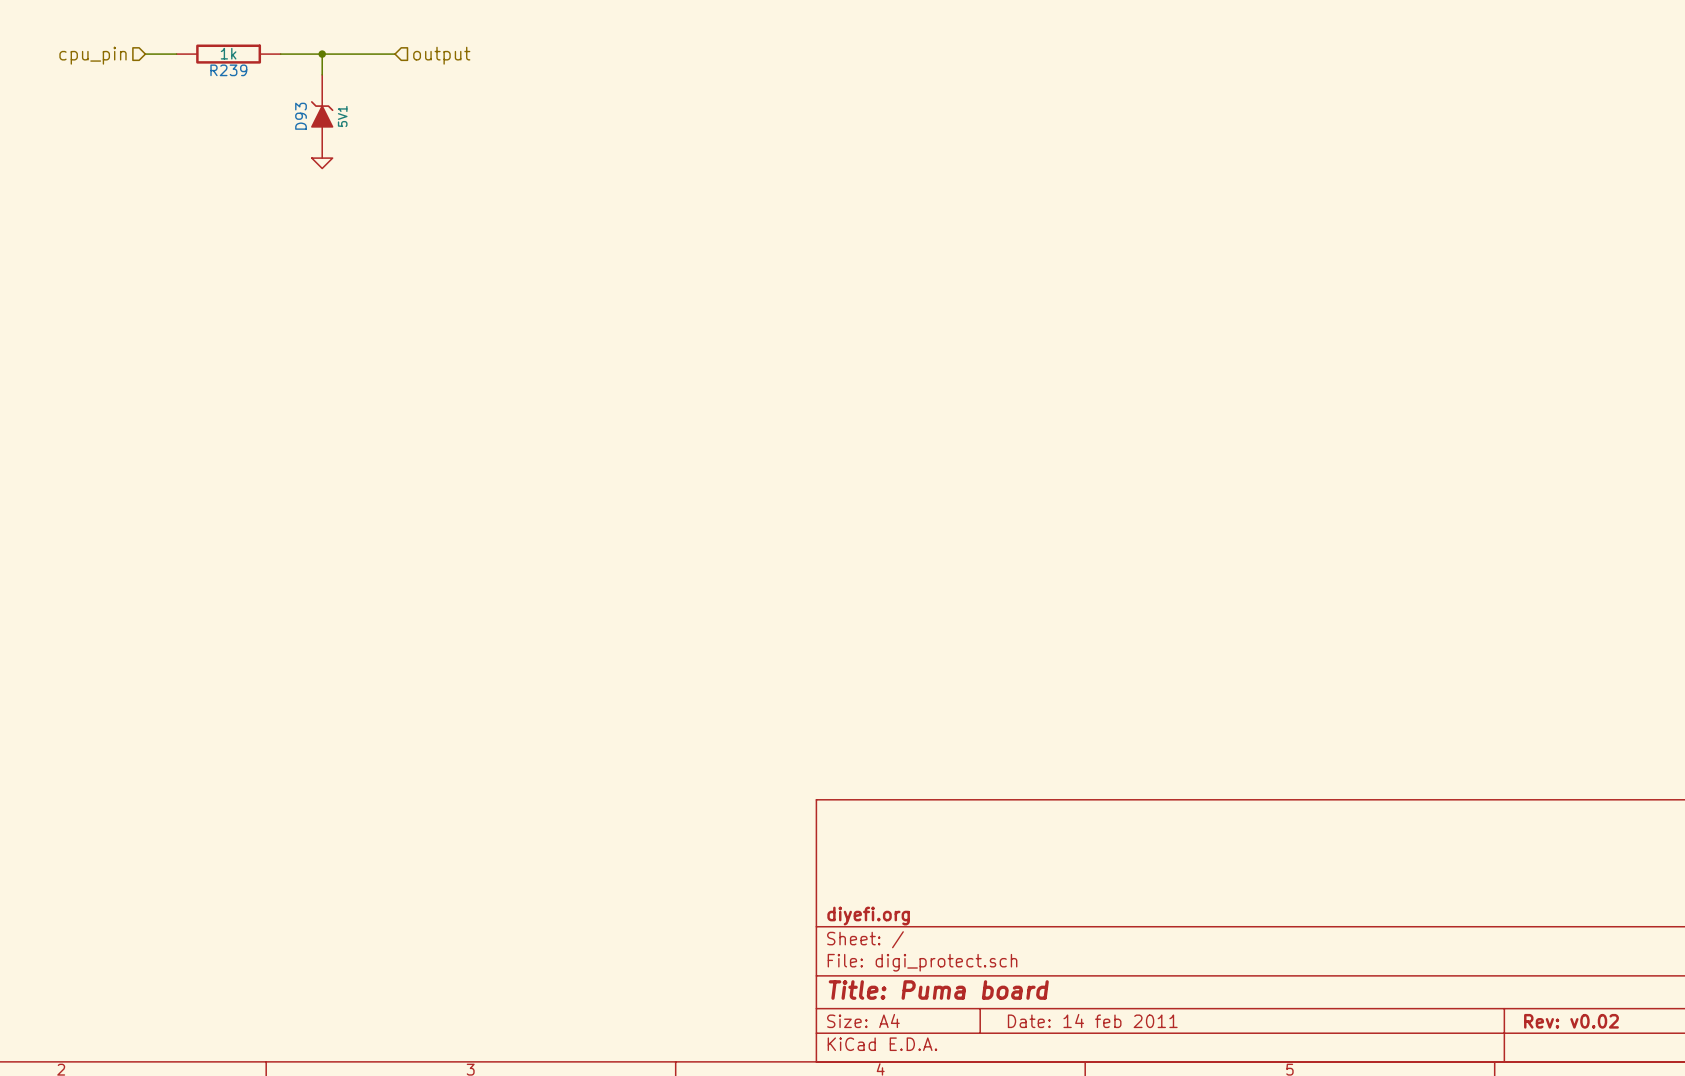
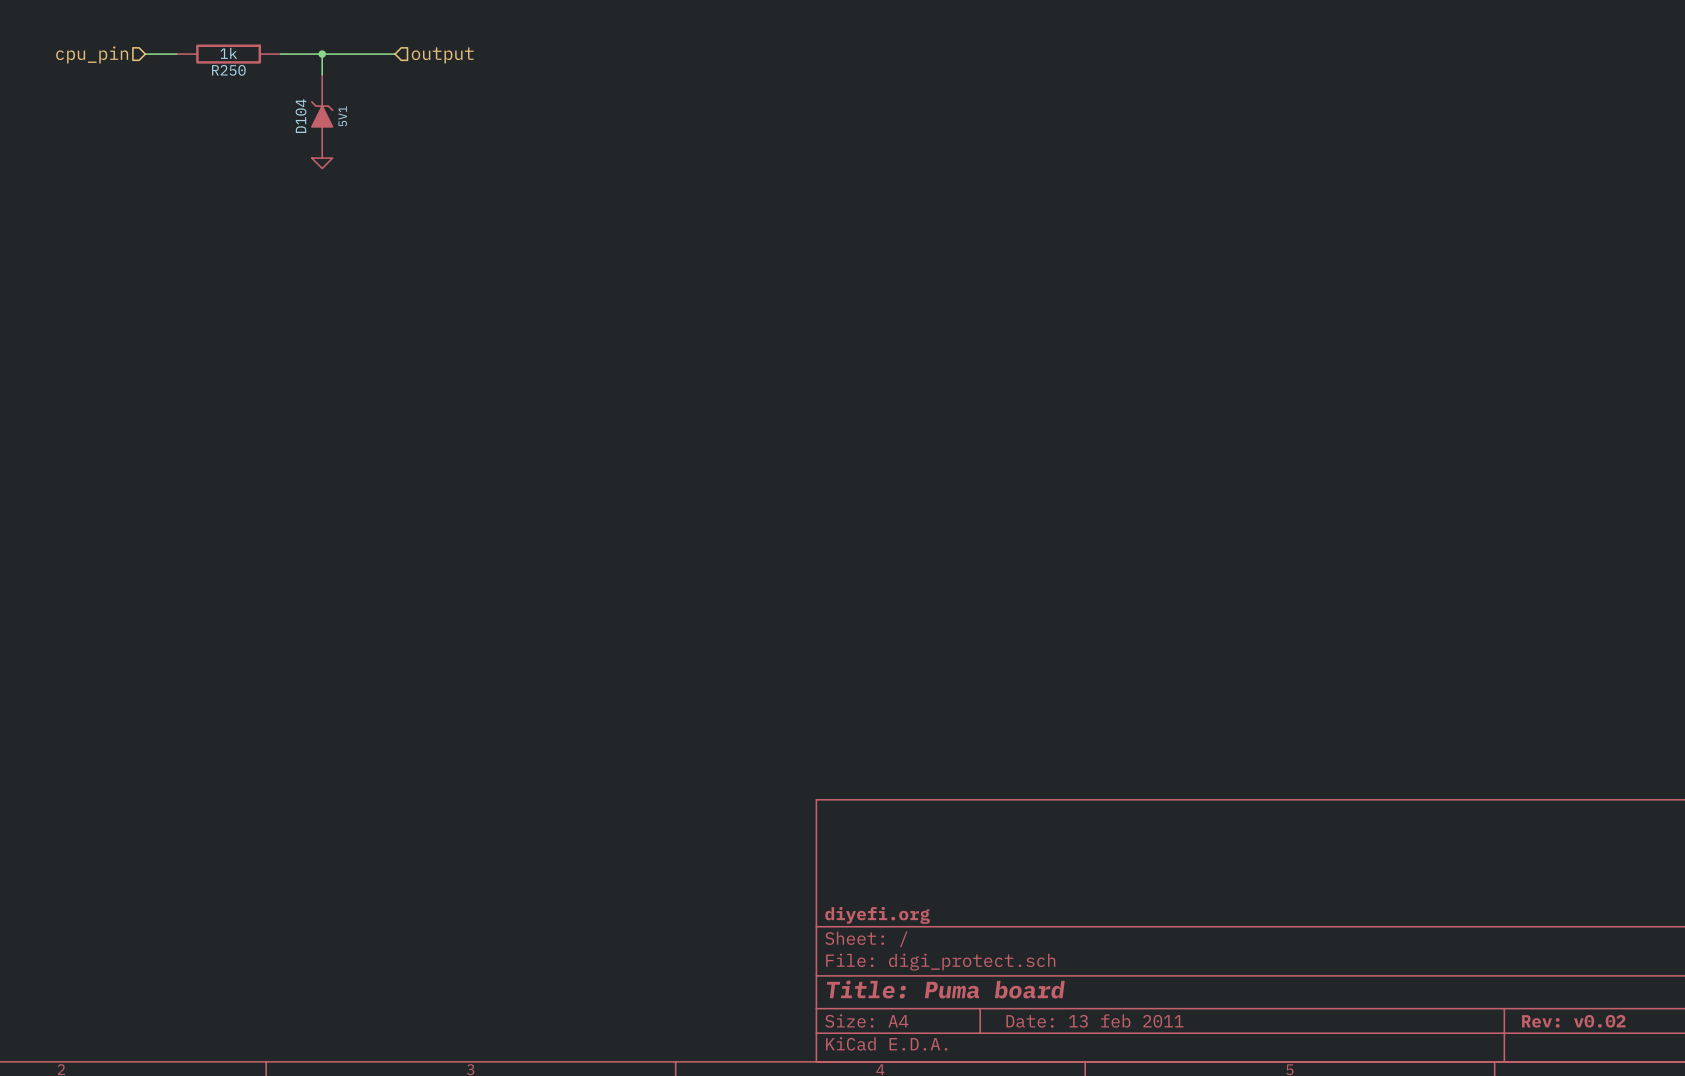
R239 name: R239 (228, 70) -> R250 (228, 70)
D93 name: D93 (301, 116) -> D104 (301, 116)
title block: Date: 14 feb 2011 (1092, 1020) -> Date: 13 feb 2011 (1094, 1021)

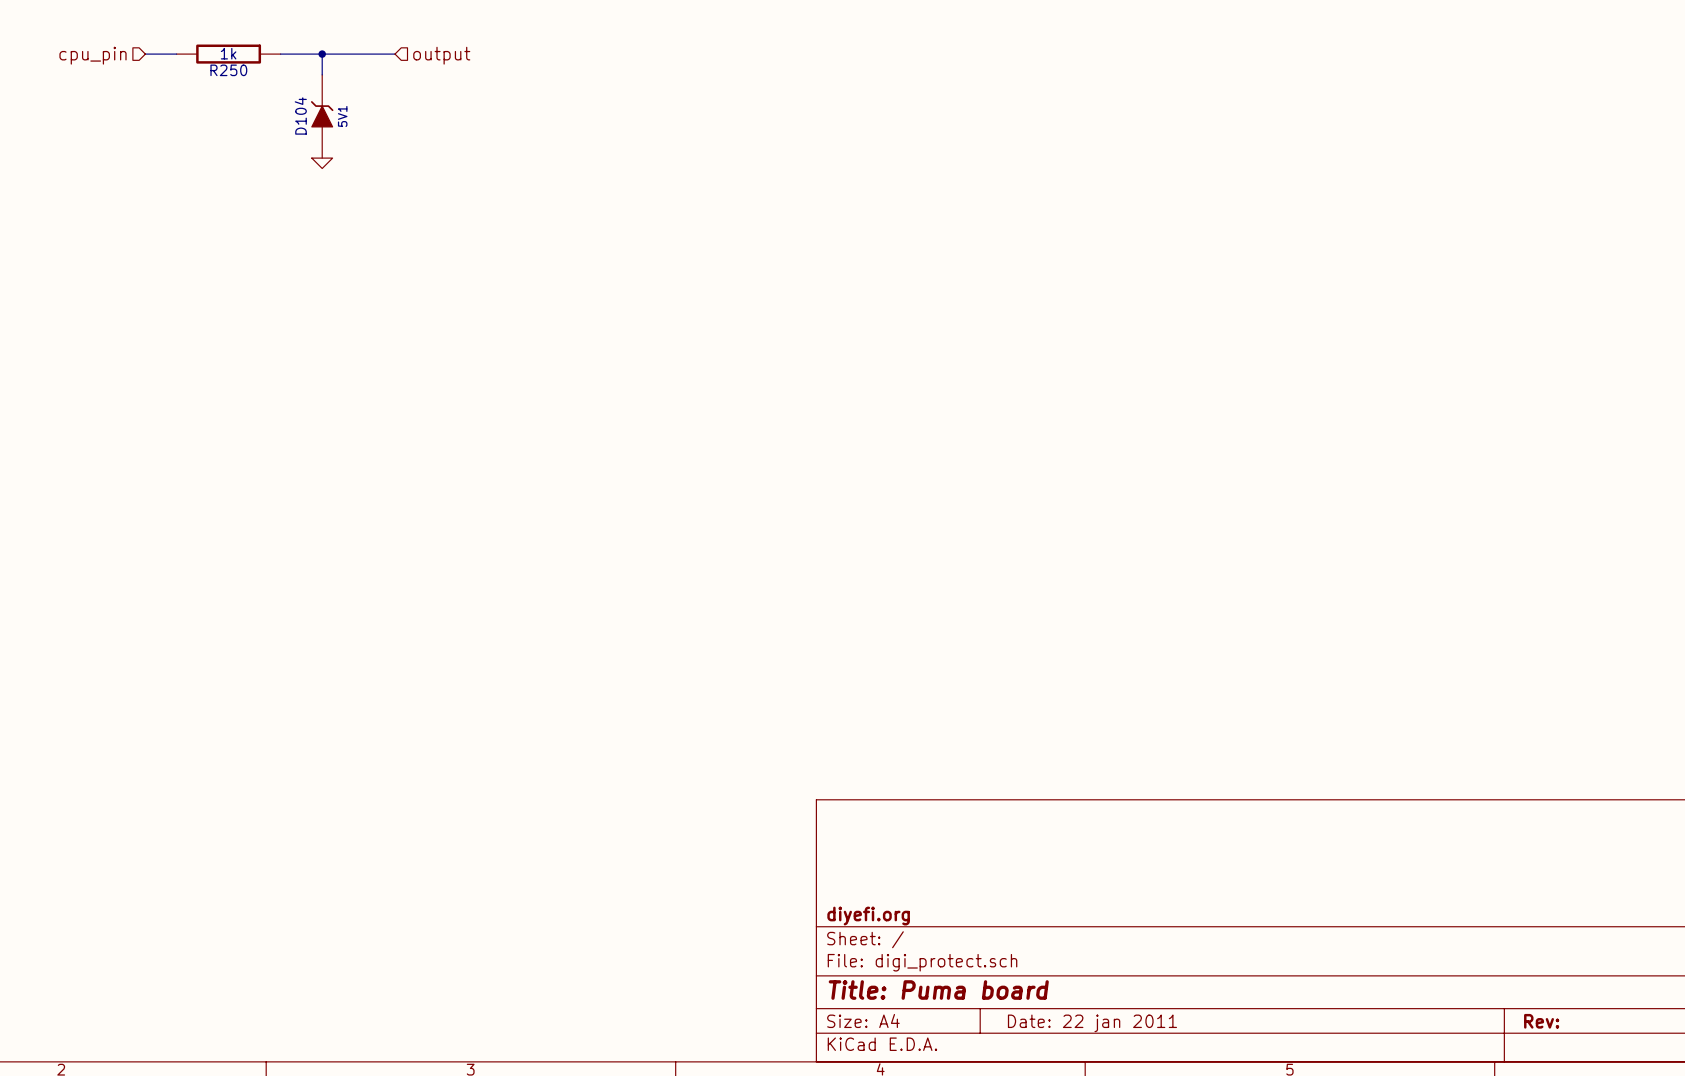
title block: Date: 13 feb 2011 (1094, 1021) -> Date: 22 jan 2011 (1092, 1023)
title block: Rev: v0.02 (1573, 1021) -> Rev: (1541, 1021)

